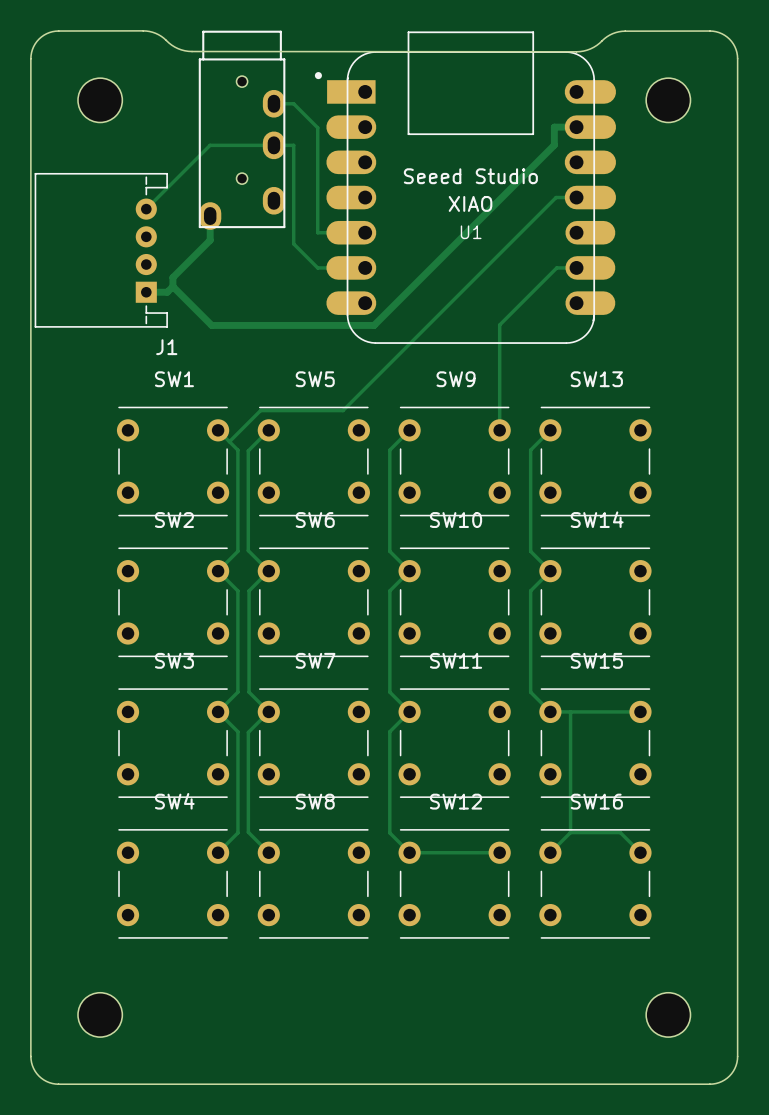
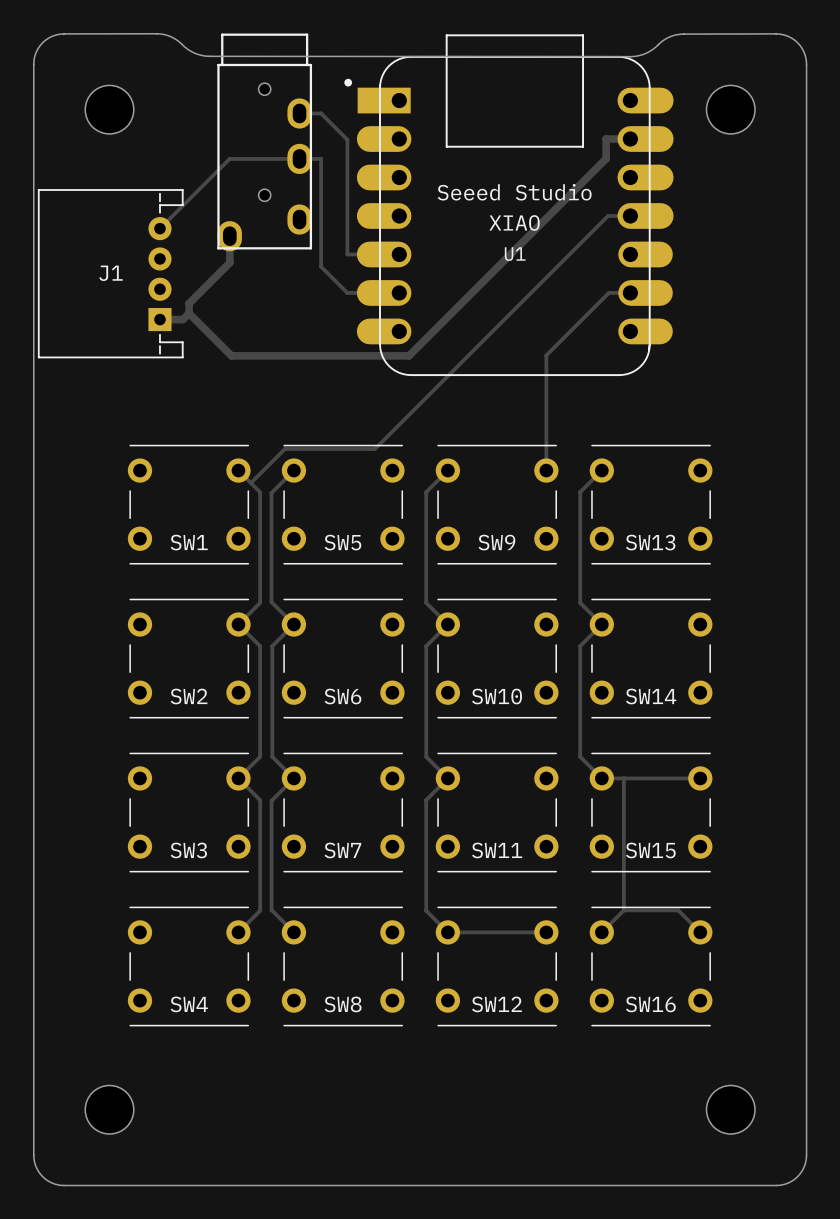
J1 name position: J1 (166, 347) -> J1 (111, 273)
SW1 name position: SW1 (174, 379) -> SW1 (189, 542)
SW5 name position: SW5 (315, 379) -> SW5 (342, 542)
SW9 name position: SW9 (456, 379) -> SW9 (496, 542)
SW13 name position: SW13 (596, 379) -> SW13 (650, 542)
SW14 name position: SW14 (597, 519) -> SW14 (651, 696)
SW2 name position: SW2 (174, 520) -> SW2 (189, 696)
SW6 name position: SW6 (315, 520) -> SW6 (342, 696)
SW10 name position: SW10 (456, 520) -> SW10 (497, 696)
SW3 name position: SW3 (174, 660) -> SW3 (188, 850)
SW7 name position: SW7 (315, 660) -> SW7 (342, 850)
SW11 name position: SW11 (456, 660) -> SW11 (497, 850)
SW15 name position: SW15 (596, 660) -> SW15 (650, 850)
SW4 name position: SW4 (174, 801) -> SW4 (189, 1004)
SW8 name position: SW8 (315, 801) -> SW8 (343, 1004)
SW12 name position: SW12 (456, 801) -> SW12 (496, 1004)
SW16 name position: SW16 (596, 801) -> SW16 (650, 1004)

